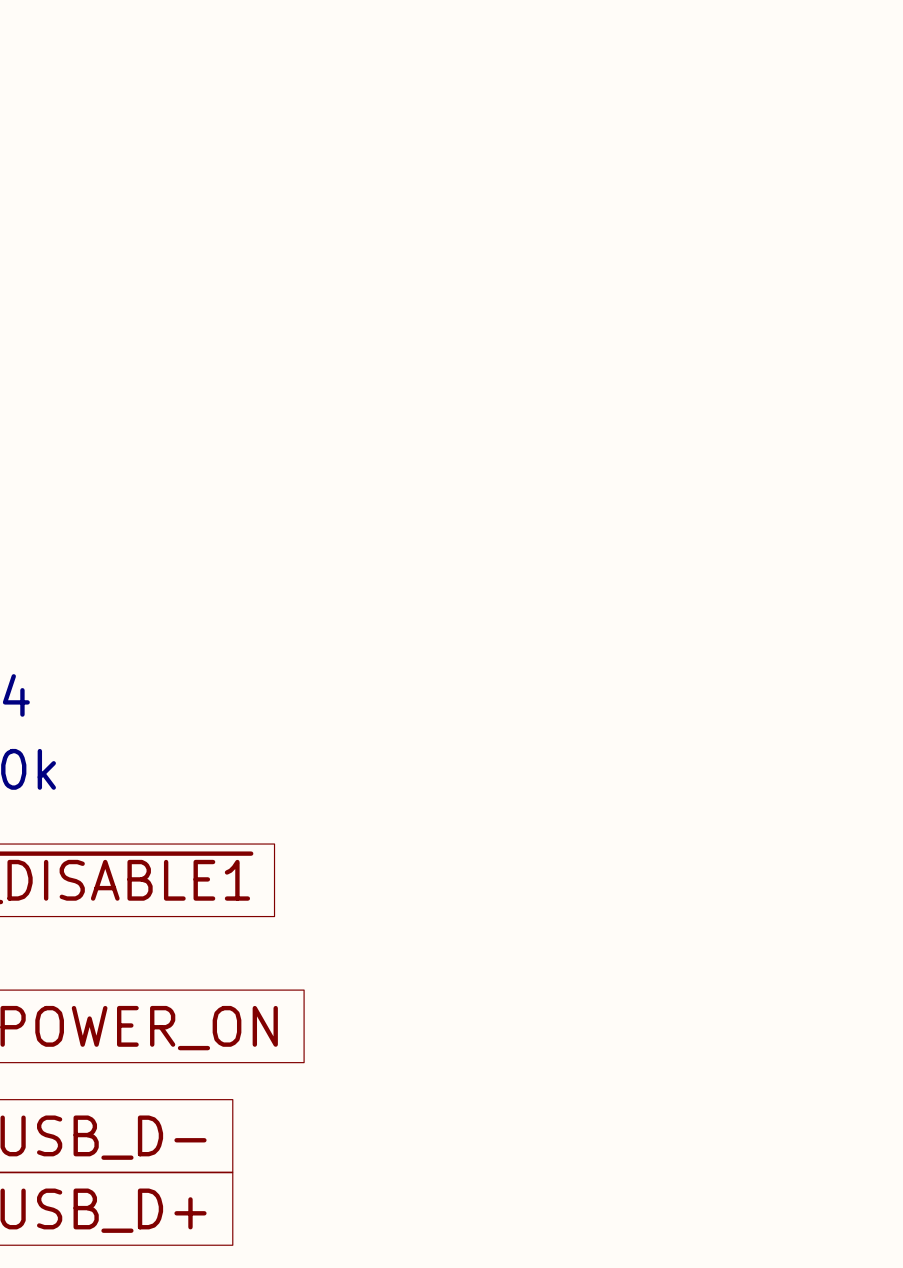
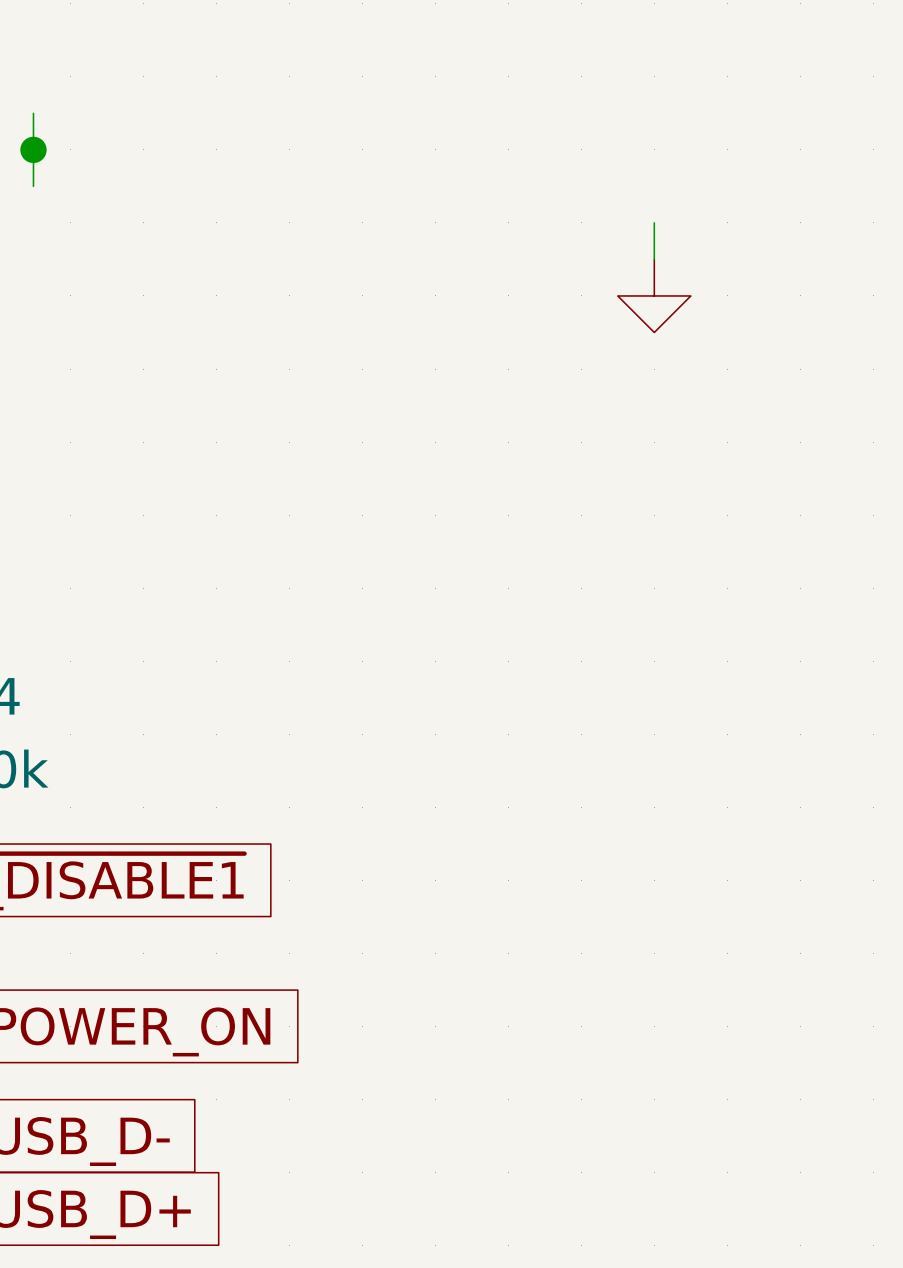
wire: none -> (33, 113) (33, 186)
junction: none -> (33, 149)
wire: none -> (654, 222) (654, 259)
power symbol: none -> (654, 295)

